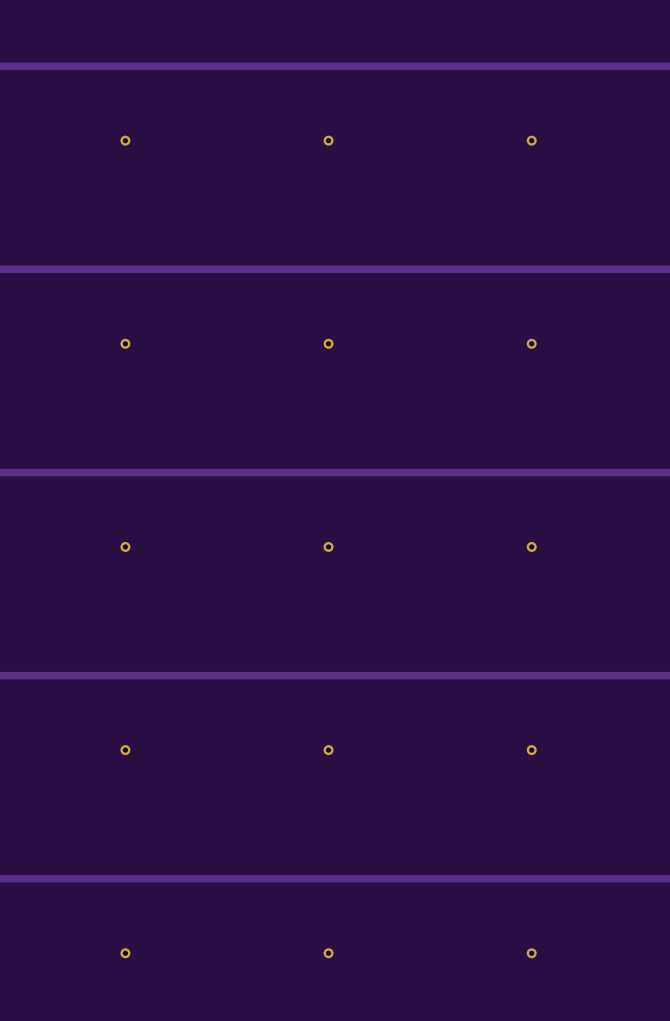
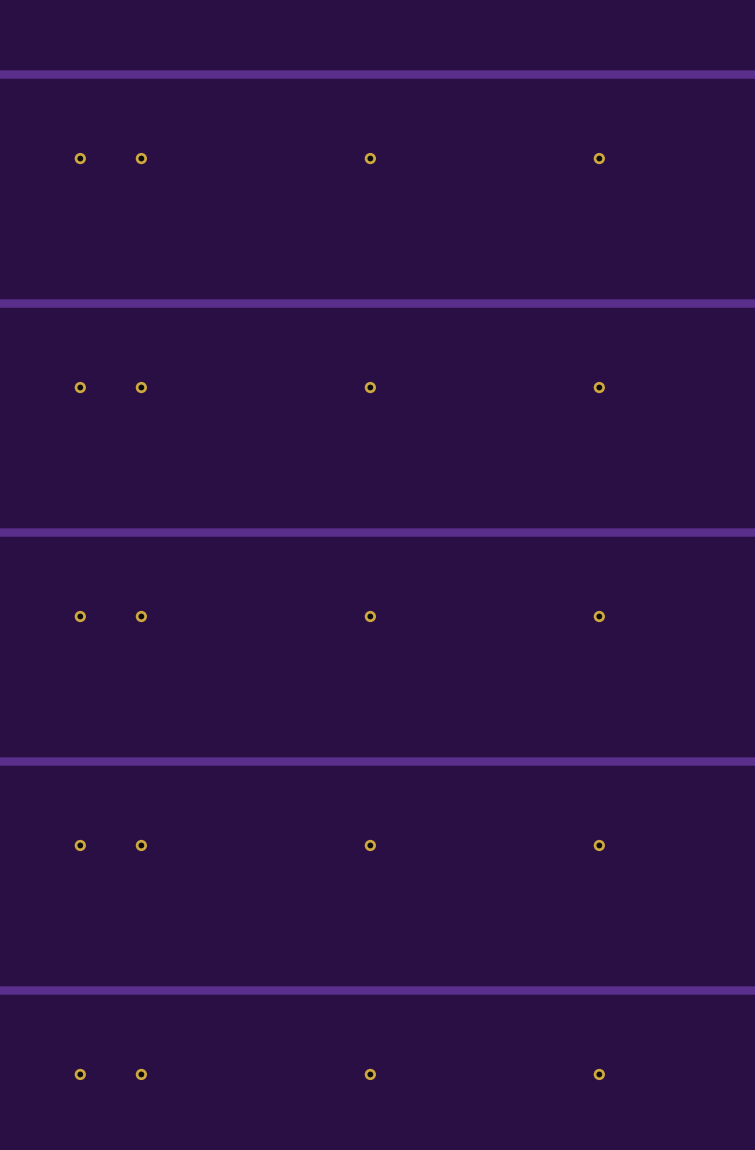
via: none -> (80, 158)
via: none -> (80, 387)
via: none -> (80, 616)
via: none -> (80, 845)
via: none -> (80, 1074)

